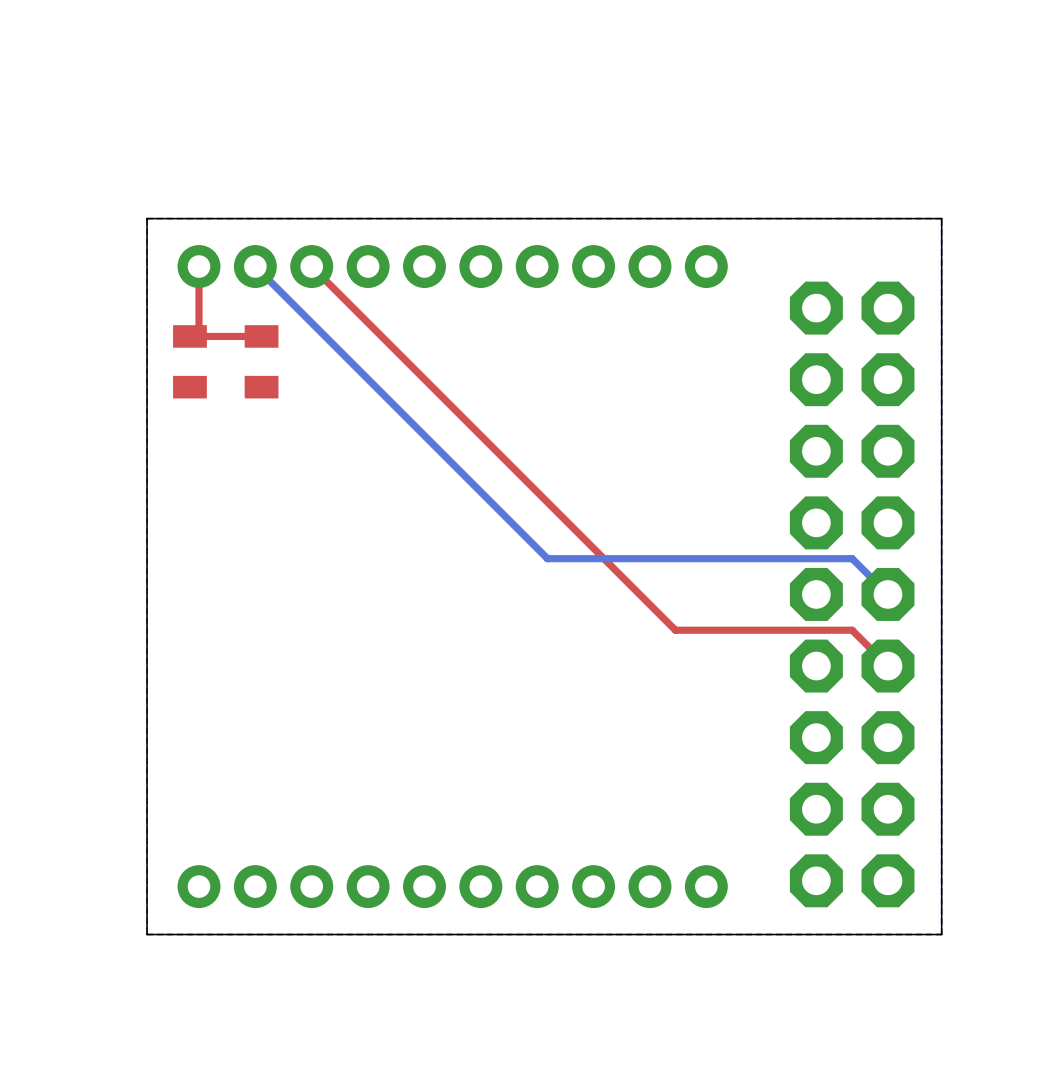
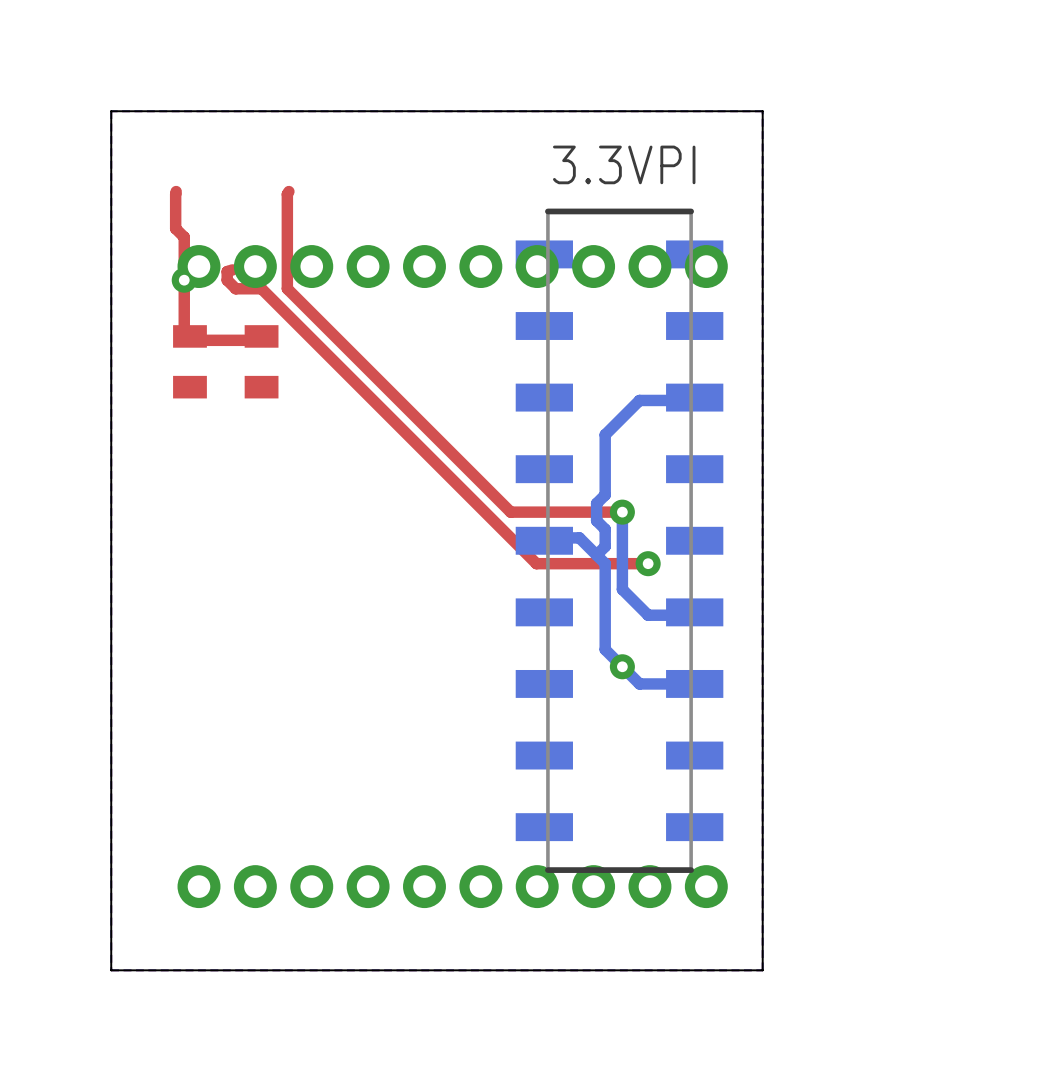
top track: none -> (288, 191) (287, 194) (287, 288) (510, 512) (622, 512)
board edge: (941, 218) (147, 218) (147, 934) (941, 934) (941, 218) -> (762, 111) (762, 970) (111, 970) (111, 111) (762, 111)
top track: (199, 266) (199, 336) -> none
bottom track: (255, 266) (547, 558) (852, 558) (887, 594) -> none
top track: (311, 266) (675, 630) (852, 630) (887, 666) -> none
top track: none -> (232, 269) (227, 271) (227, 280) (235, 288) (261, 288) (536, 563) (648, 563)
via: none -> (184, 280)
top track: (261, 336) (189, 336) -> (261, 336) (261, 340) (192, 340) (184, 331) (184, 237) (175, 228) (176, 191)
bottom track: none -> (694, 397) (691, 400) (639, 400) (605, 434) (605, 494) (596, 503) (596, 520) (605, 529) (605, 546) (596, 555)
bottom track: none -> (622, 512) (622, 589) (648, 615) (691, 615) (694, 612)
via: none -> (622, 512)
bottom track: none -> (544, 540) (545, 537) (579, 537) (605, 563) (605, 649) (639, 683) (694, 683)
3.3VPI: none -> (619, 540)
via: none -> (648, 563)
part: (852, 594) -> none
via: none -> (622, 666)

